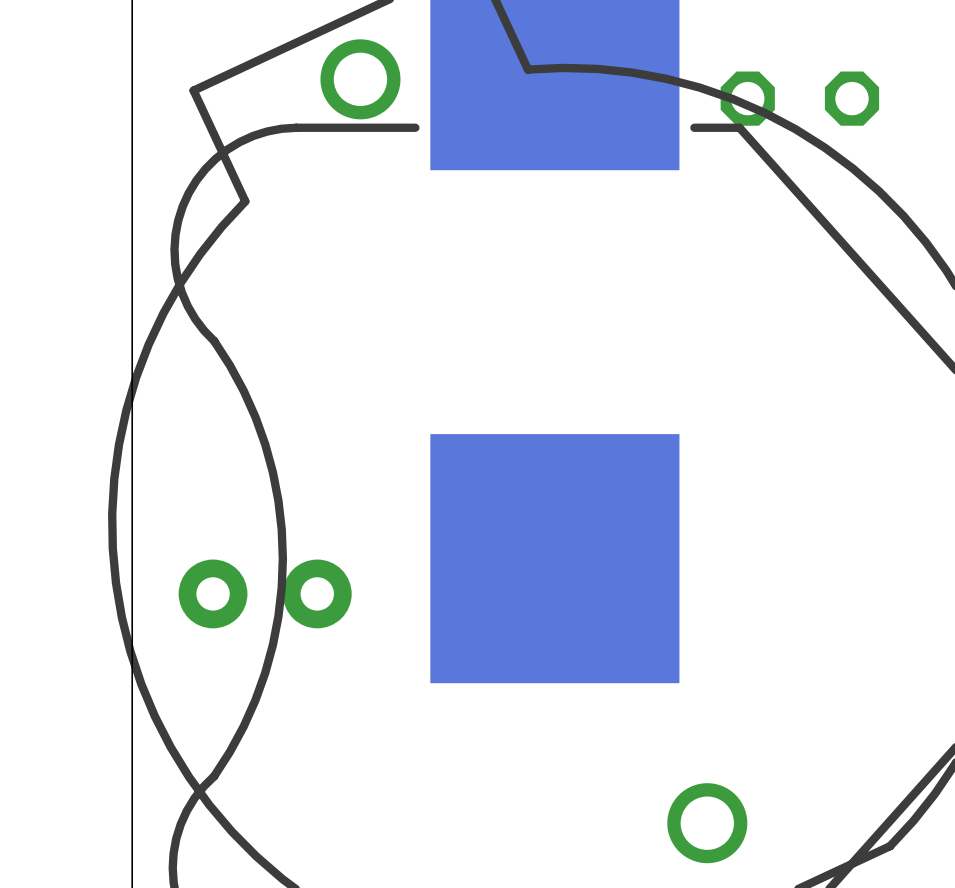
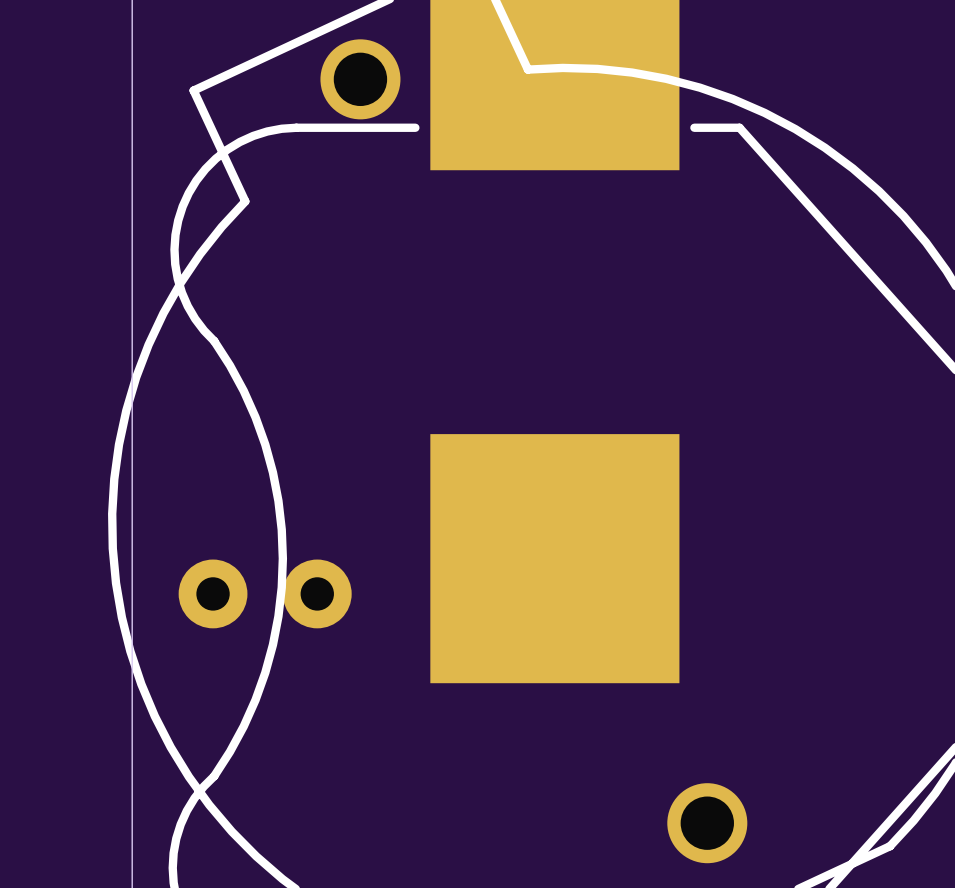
part: (799, 98) -> none

